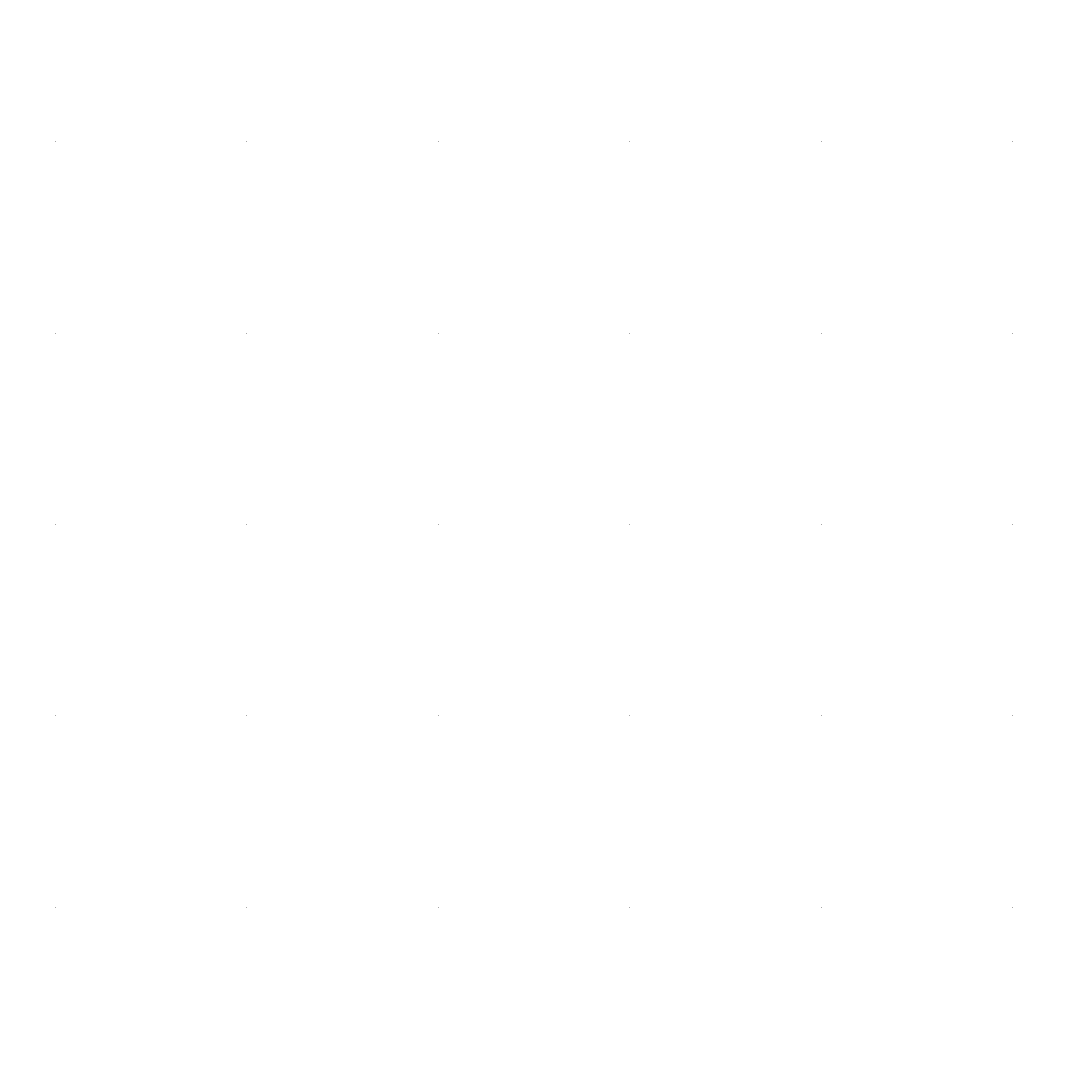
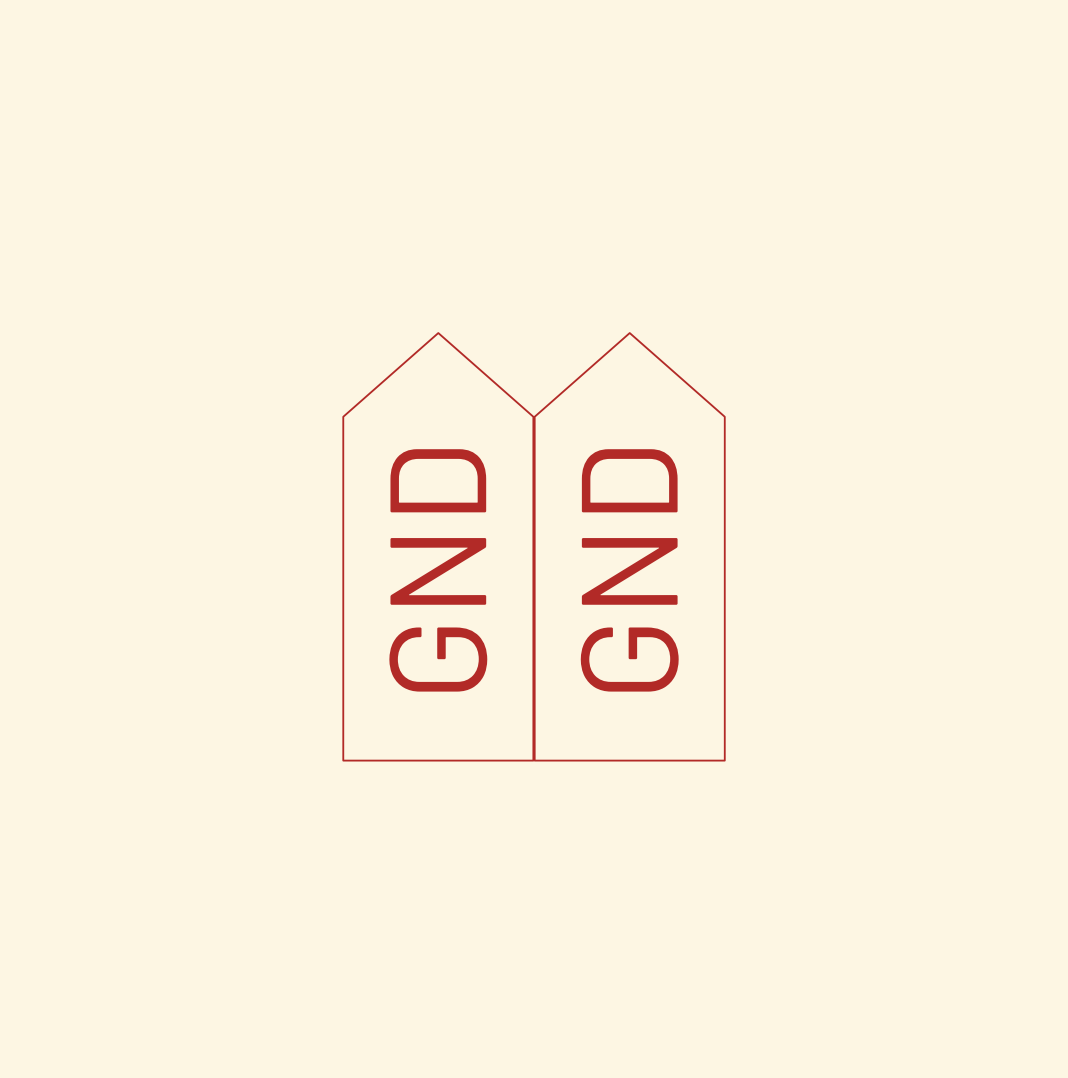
global label: none -> GND (438, 570)
global label: none -> GND (629, 570)

